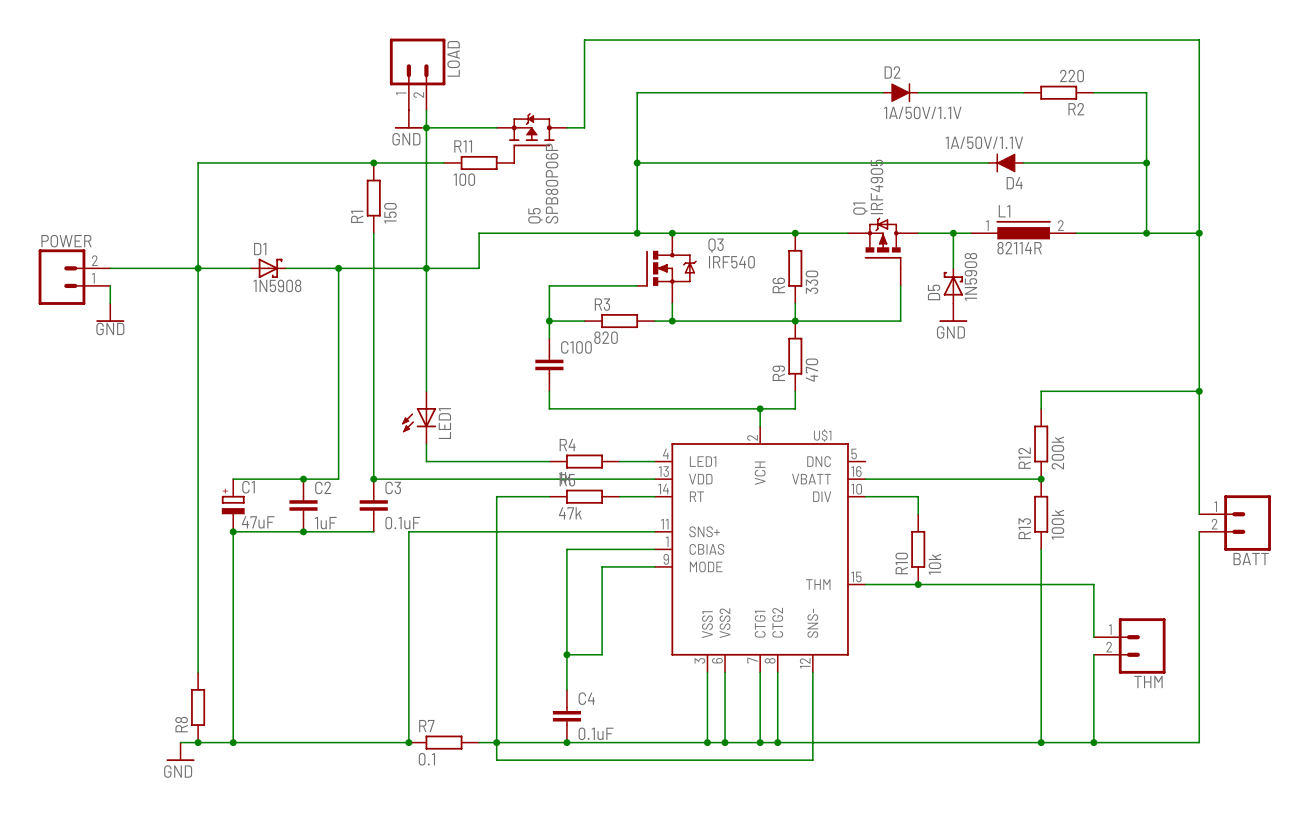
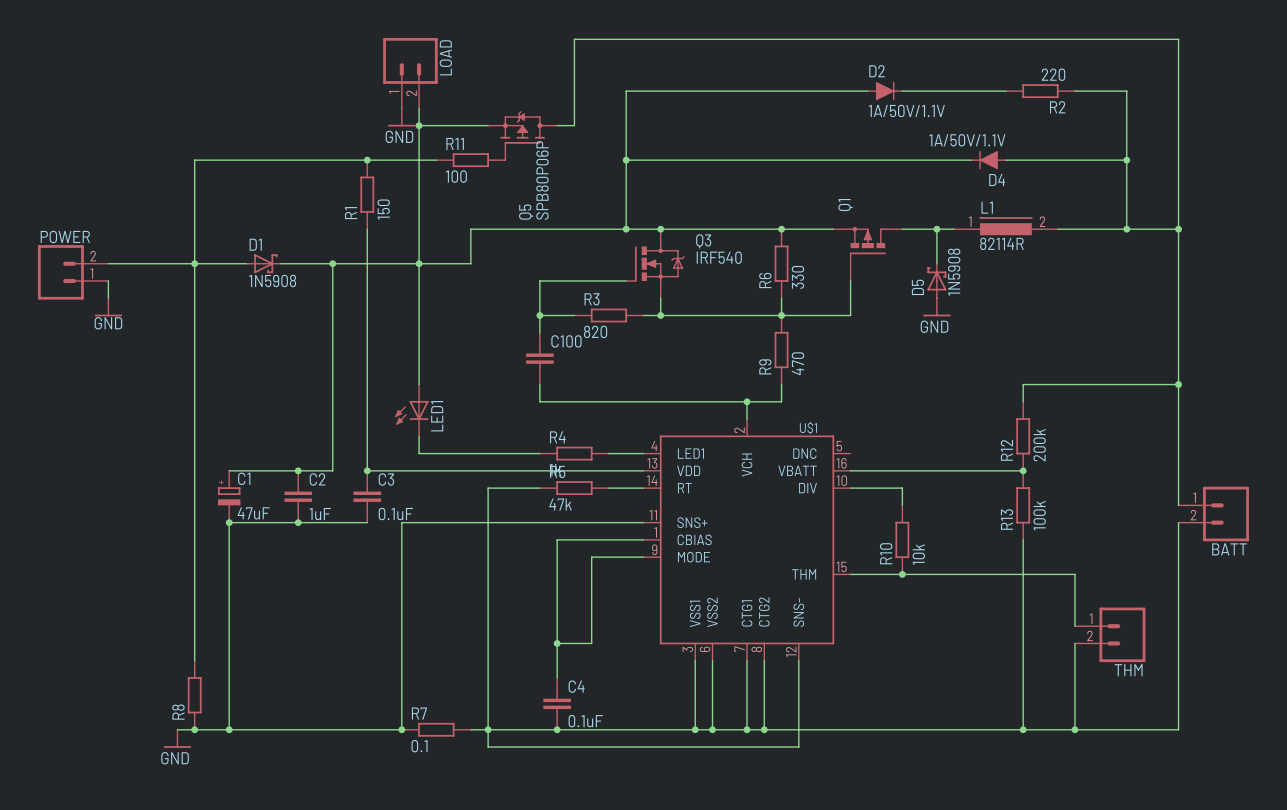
Q1 value: IRF4905 (876, 186) -> none
Q1 symbol: [847, 217, 919, 286] -> [833, 226, 903, 281]
wire: (900, 285) (900, 321) (865, 321) -> (850, 280) (850, 315)

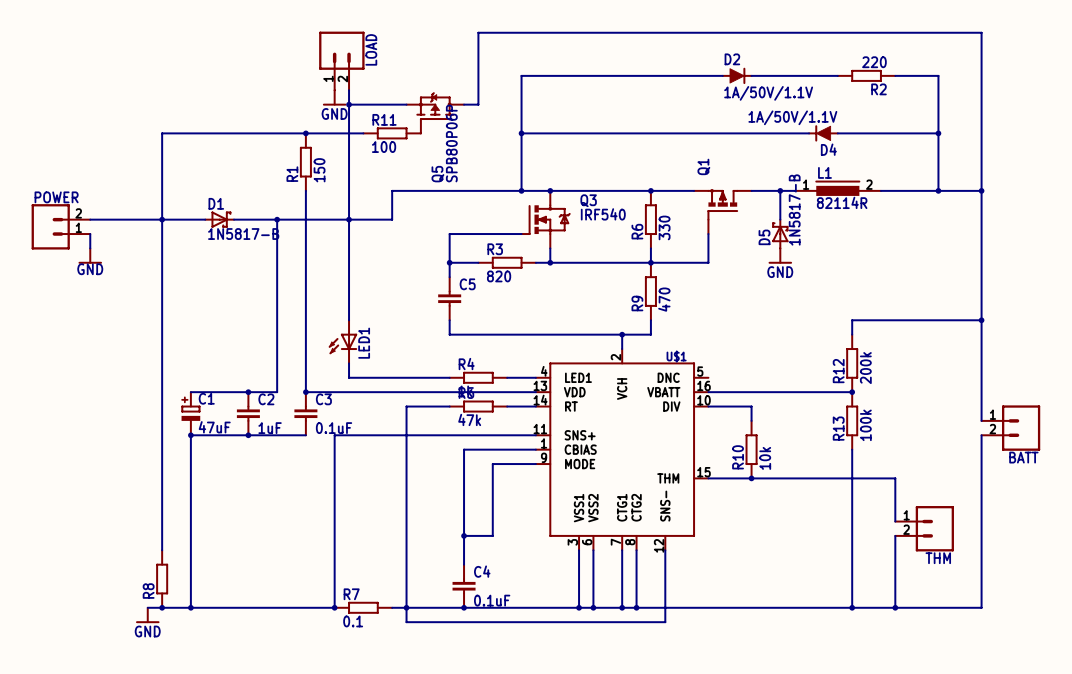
D5 value: 1N5908 (954, 272) -> 1N5817-B (794, 209)
D1 value: 1N5908 (272, 280) -> 1N5817-B (243, 234)
C100 name: C100 (566, 341) -> C5 (467, 284)

